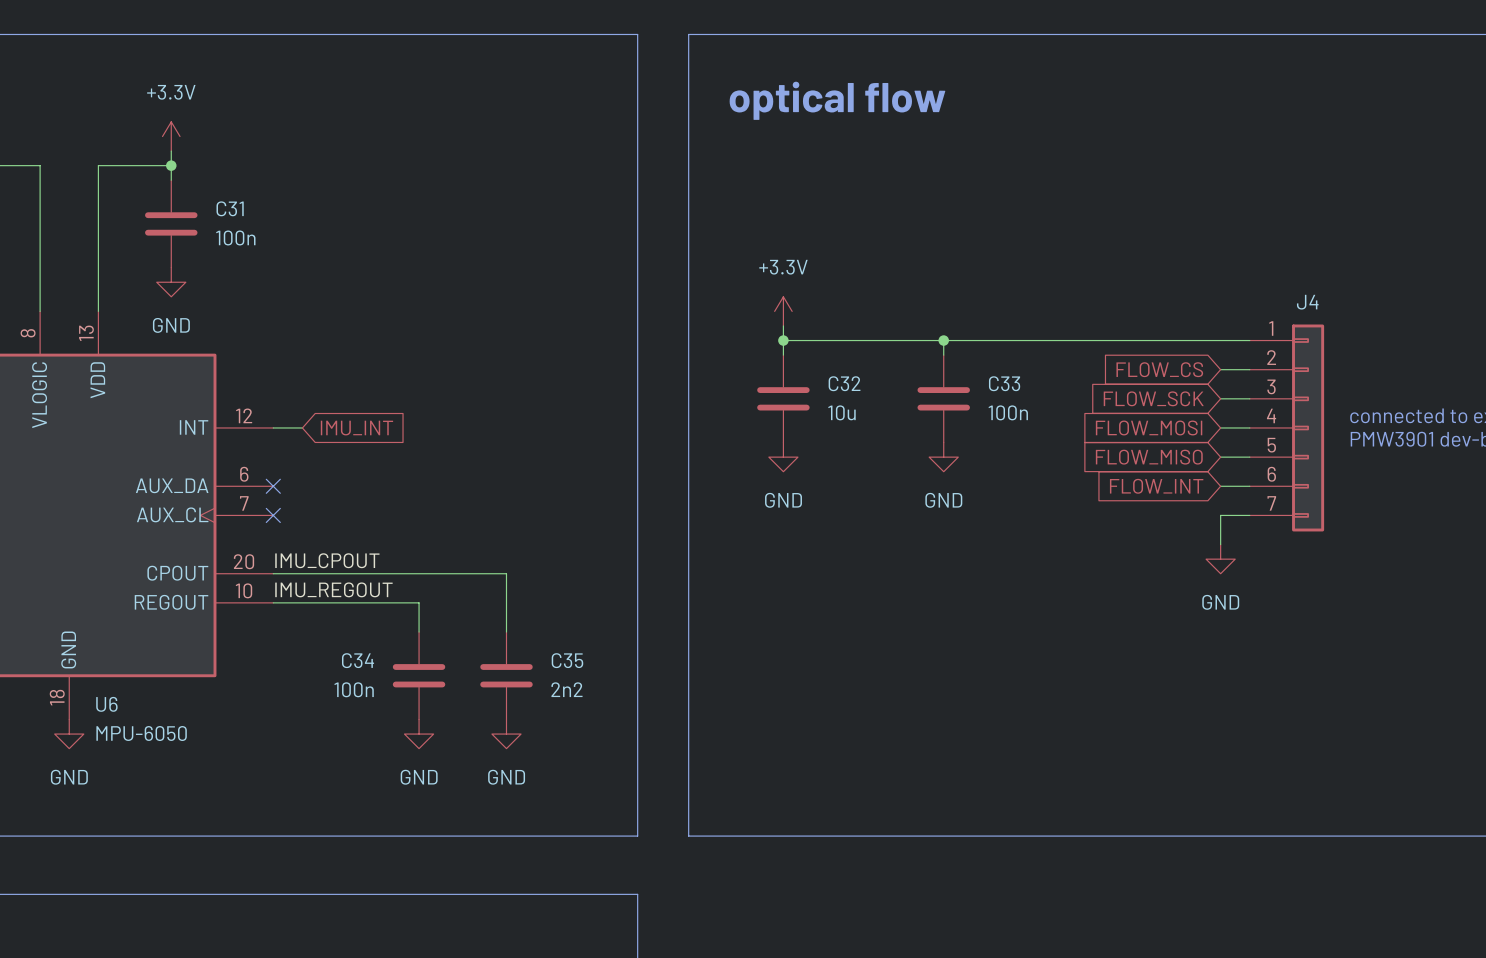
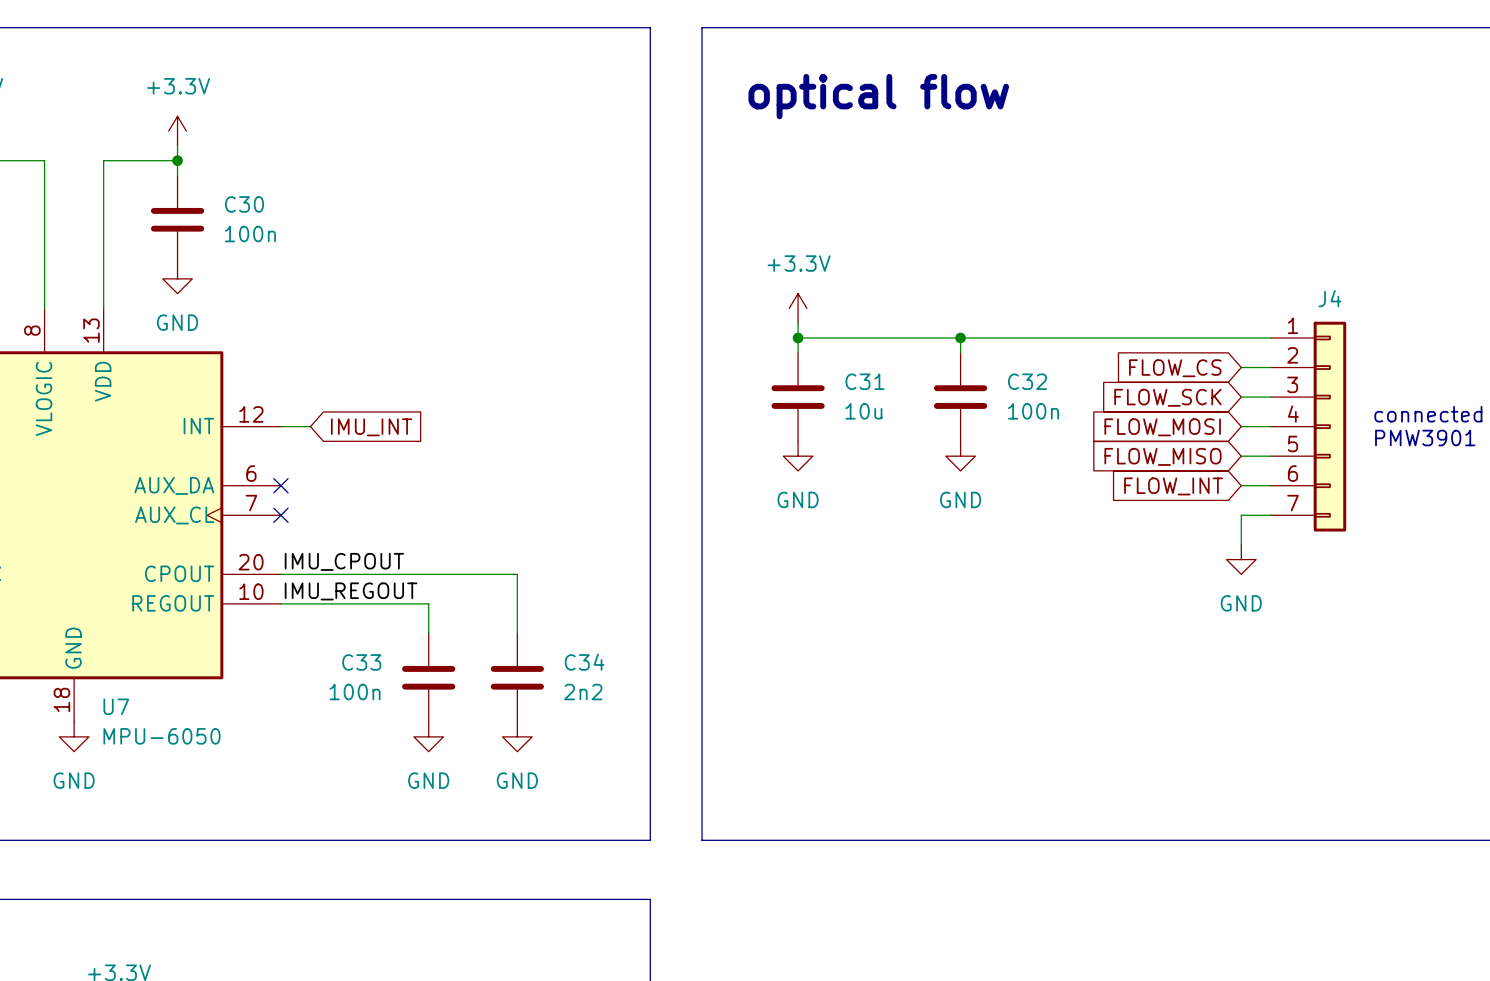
C31 name: C31 (230, 208) -> C30 (244, 204)
C32 name: C32 (844, 383) -> C31 (865, 381)
C33 name: C33 (1004, 383) -> C32 (1027, 381)
C34 name: C34 (358, 660) -> C33 (361, 662)
C35 name: C35 (567, 660) -> C34 (584, 662)
U6 name: U6 (106, 704) -> U7 (116, 706)

